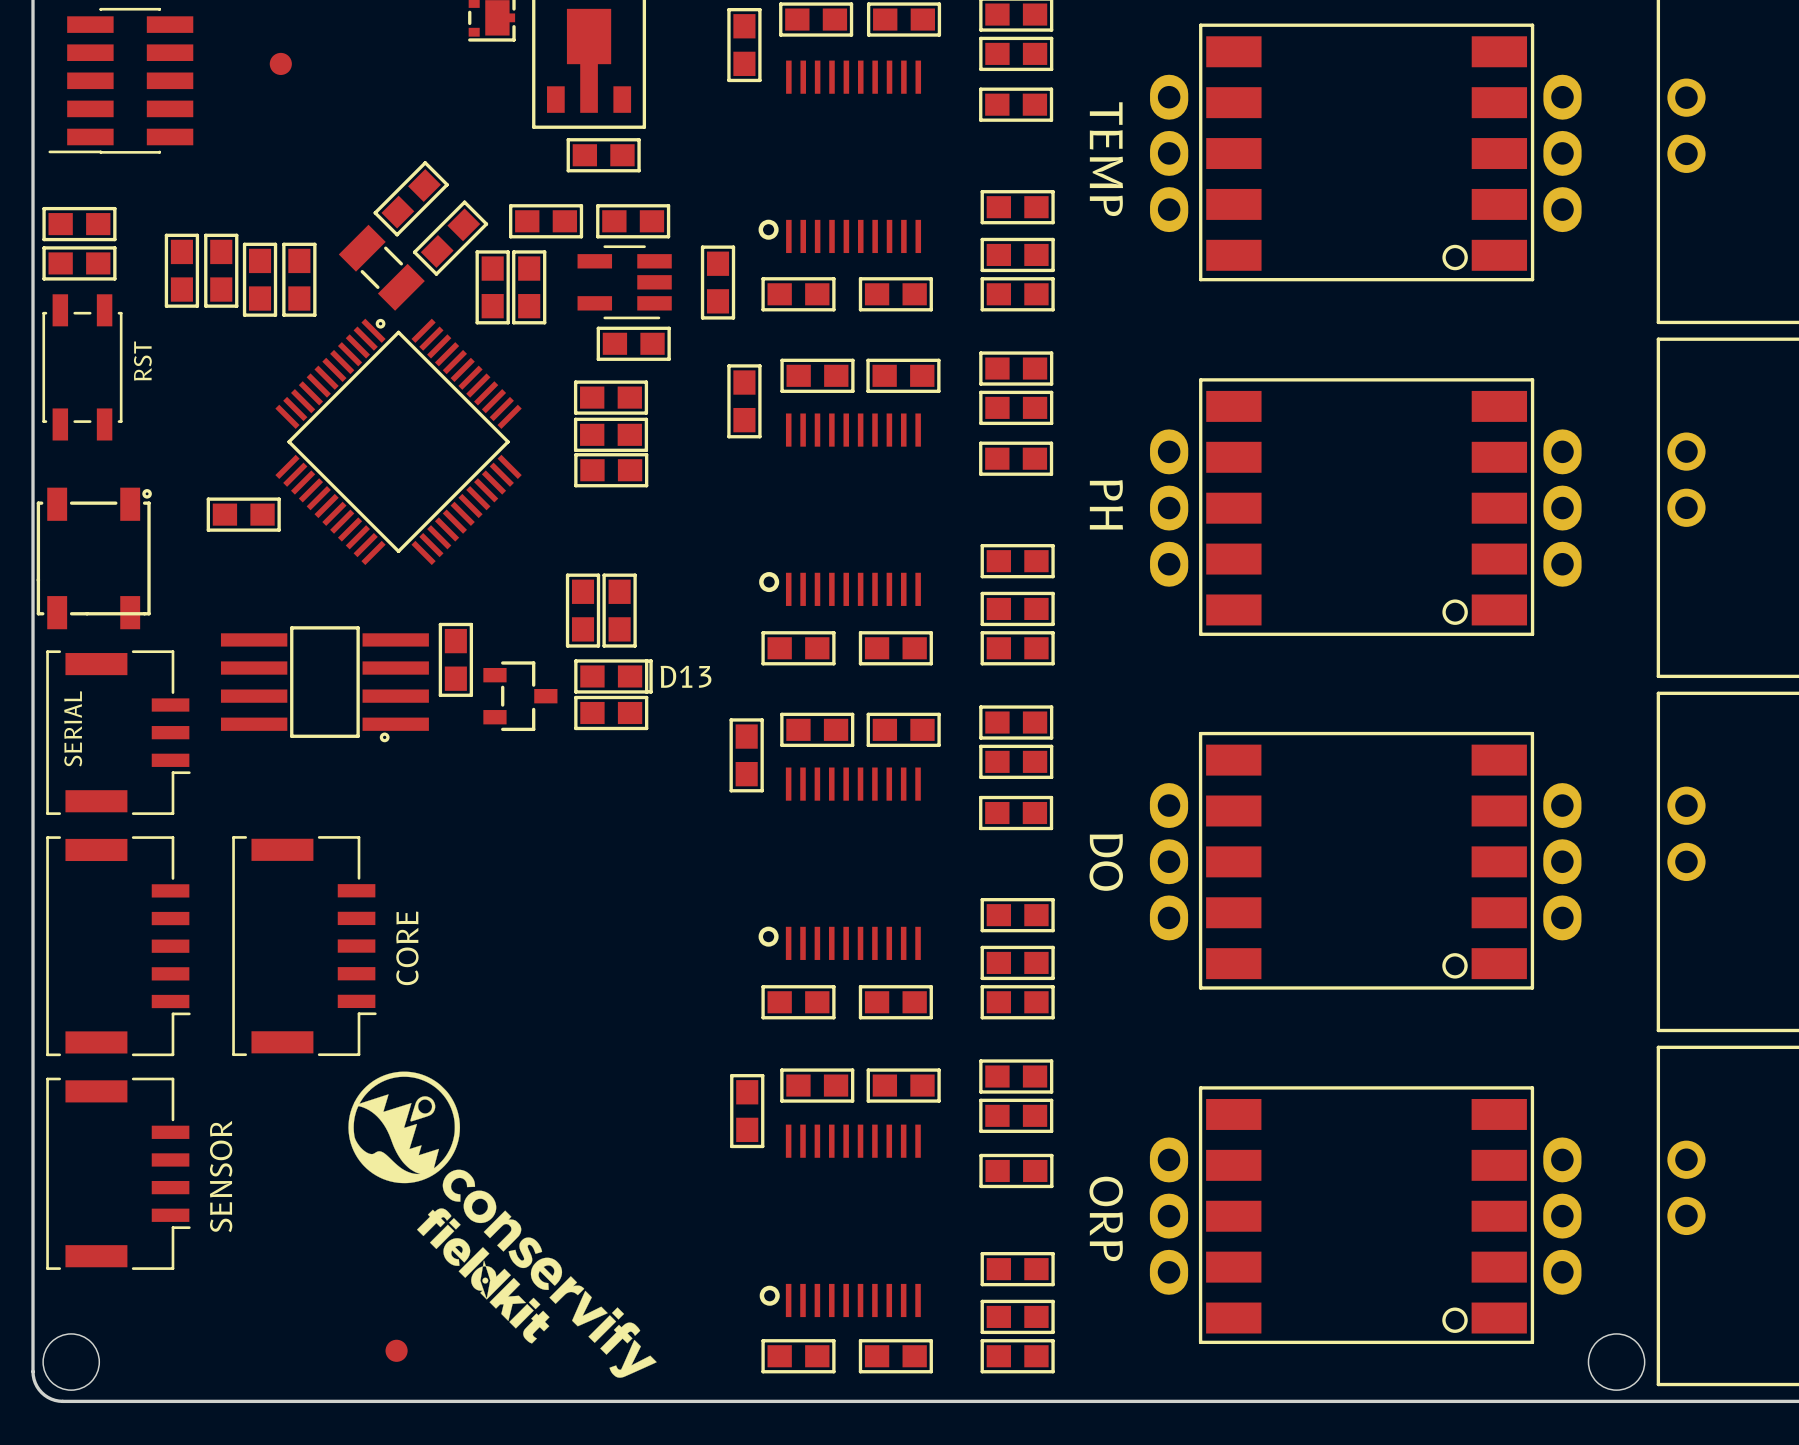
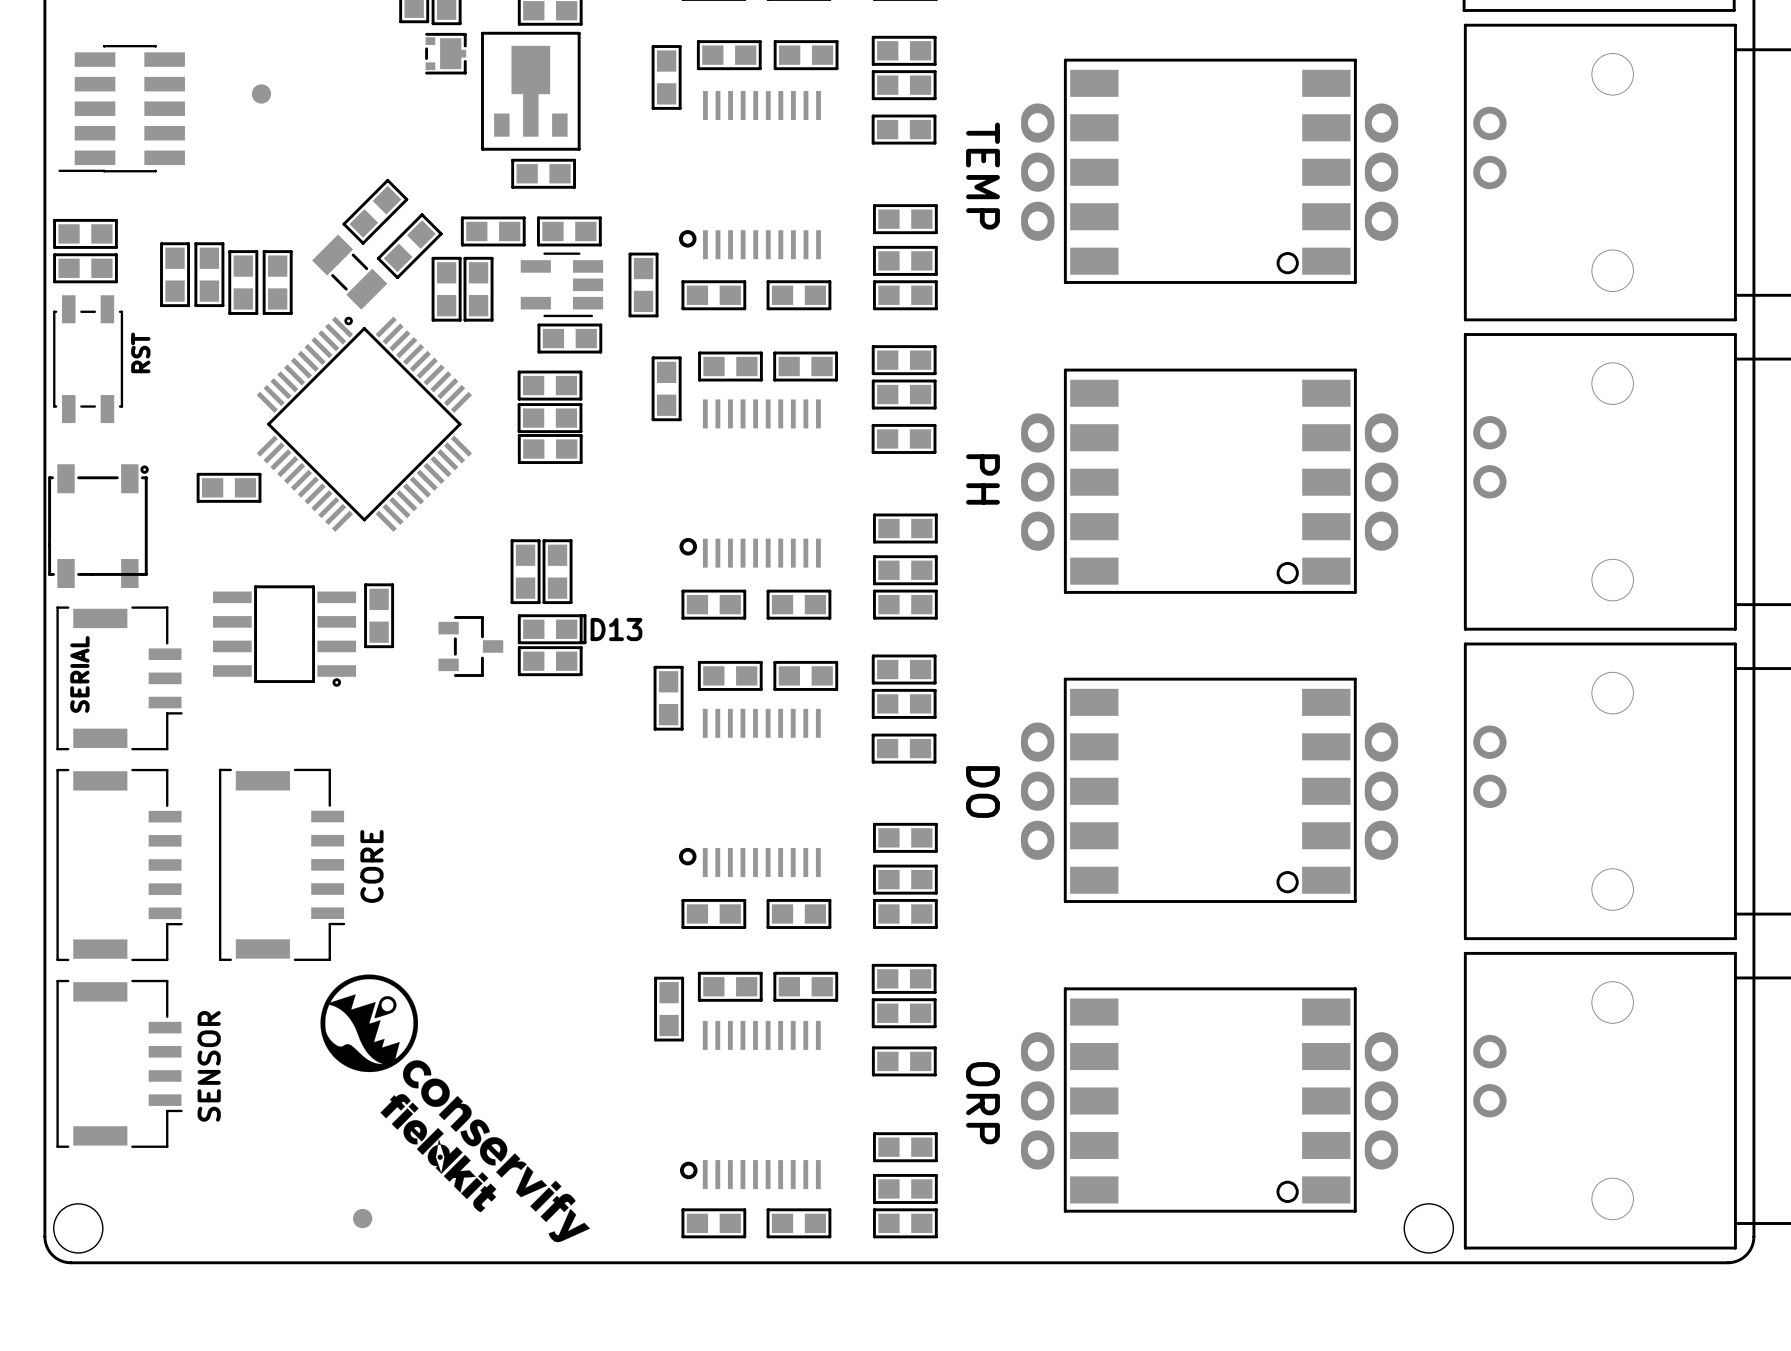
part footprint: [220, 626, 429, 743] -> [213, 585, 357, 687]
part position: (455, 659) -> (379, 615)

